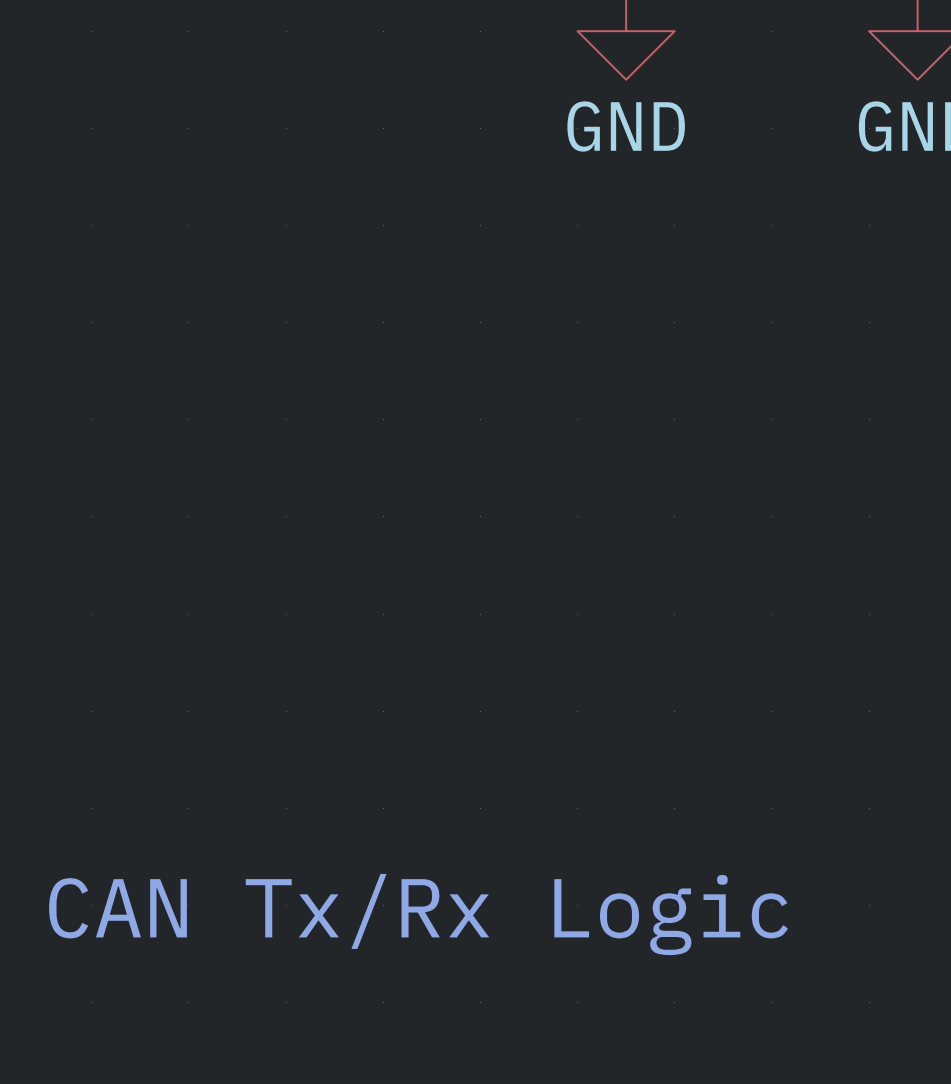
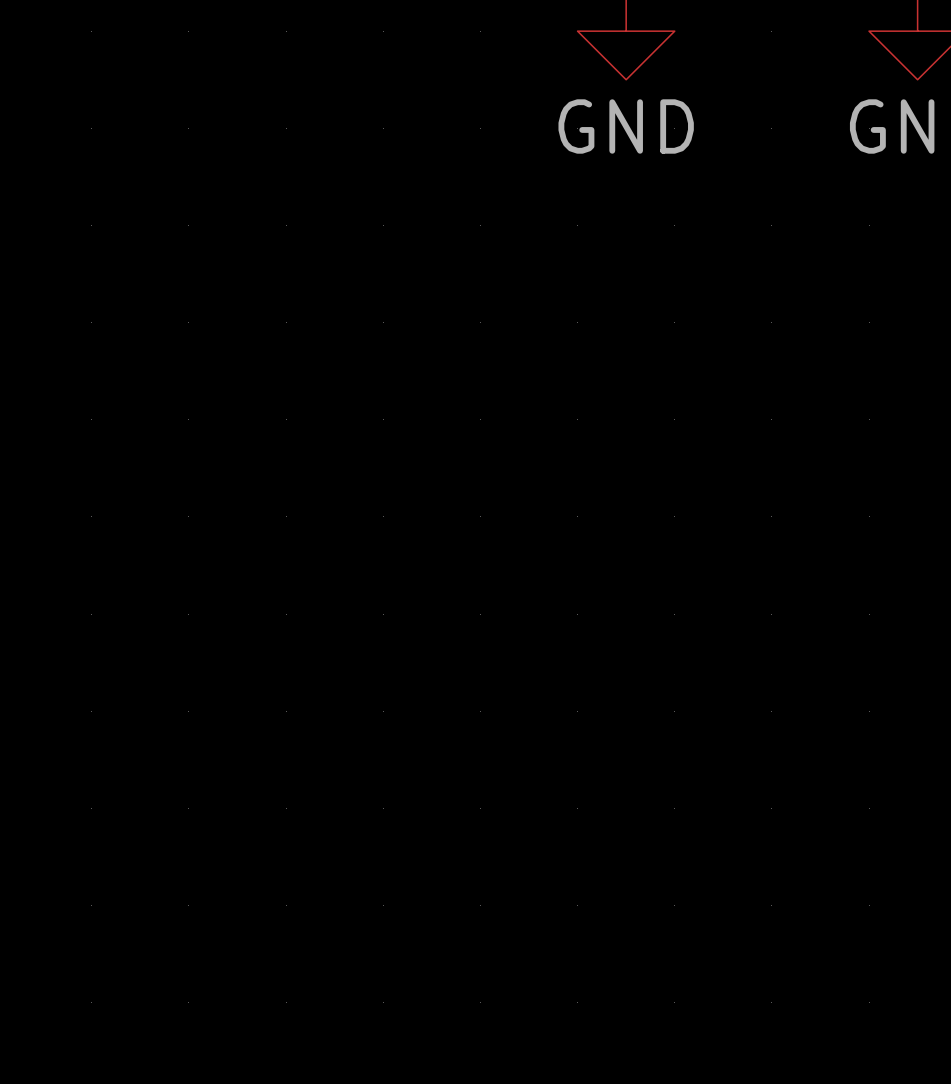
text: CAN Tx/Rx Logic (418, 914) -> none

